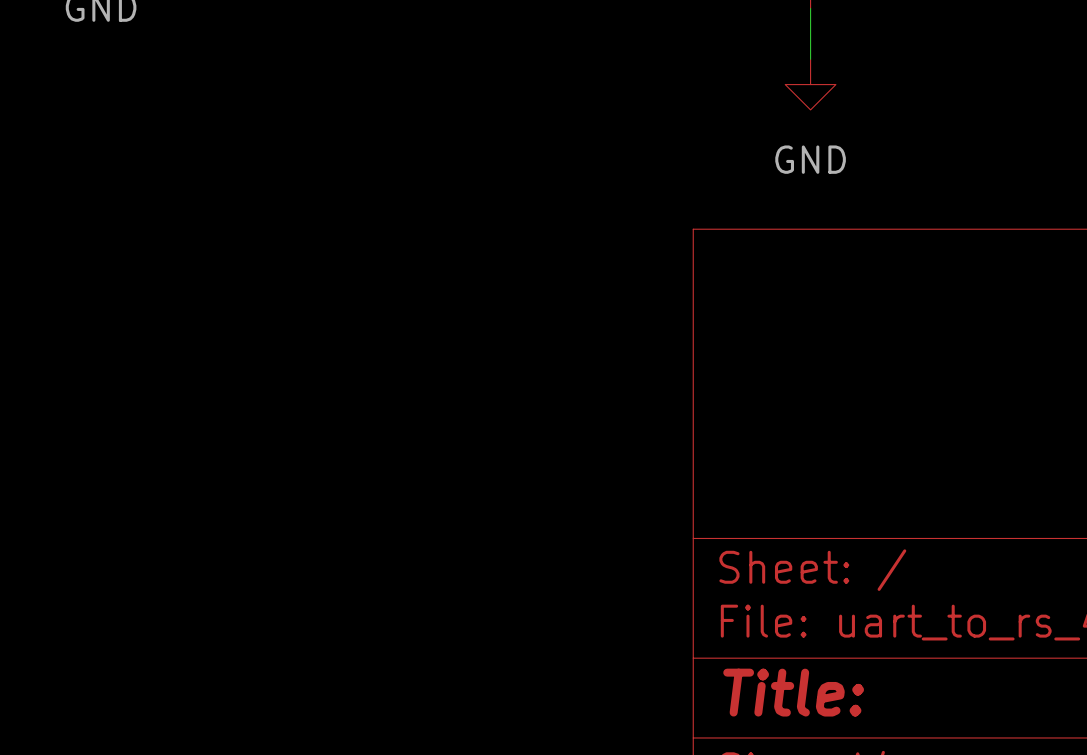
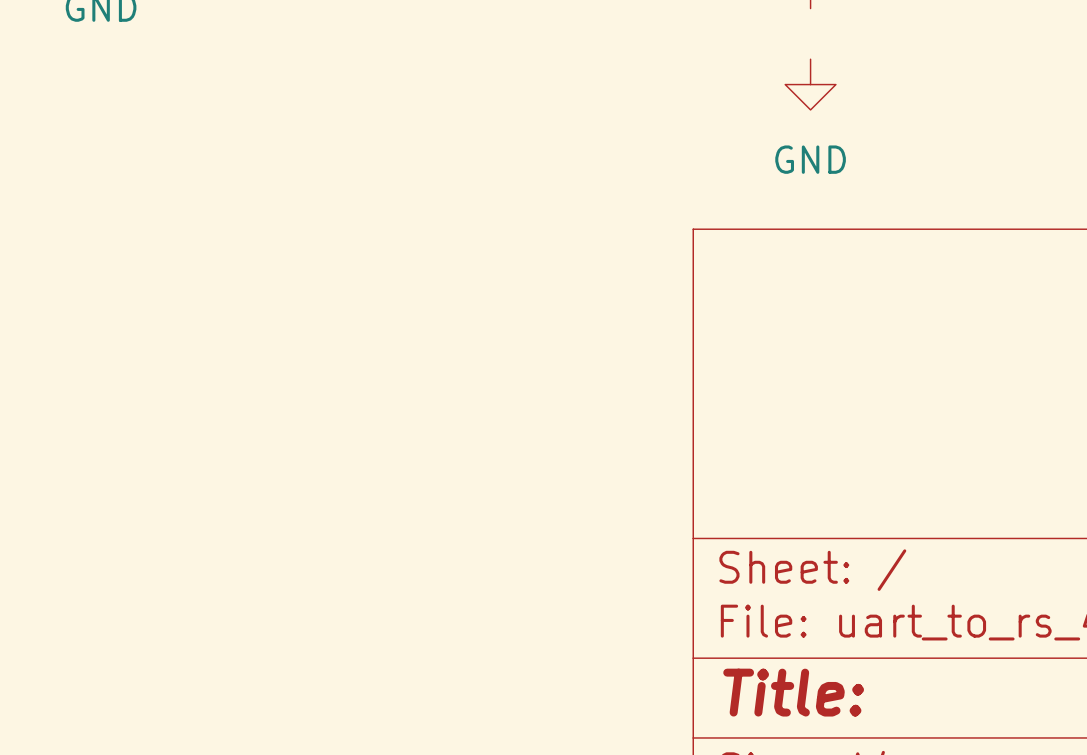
wire: (810, 8) (810, 59) -> none

